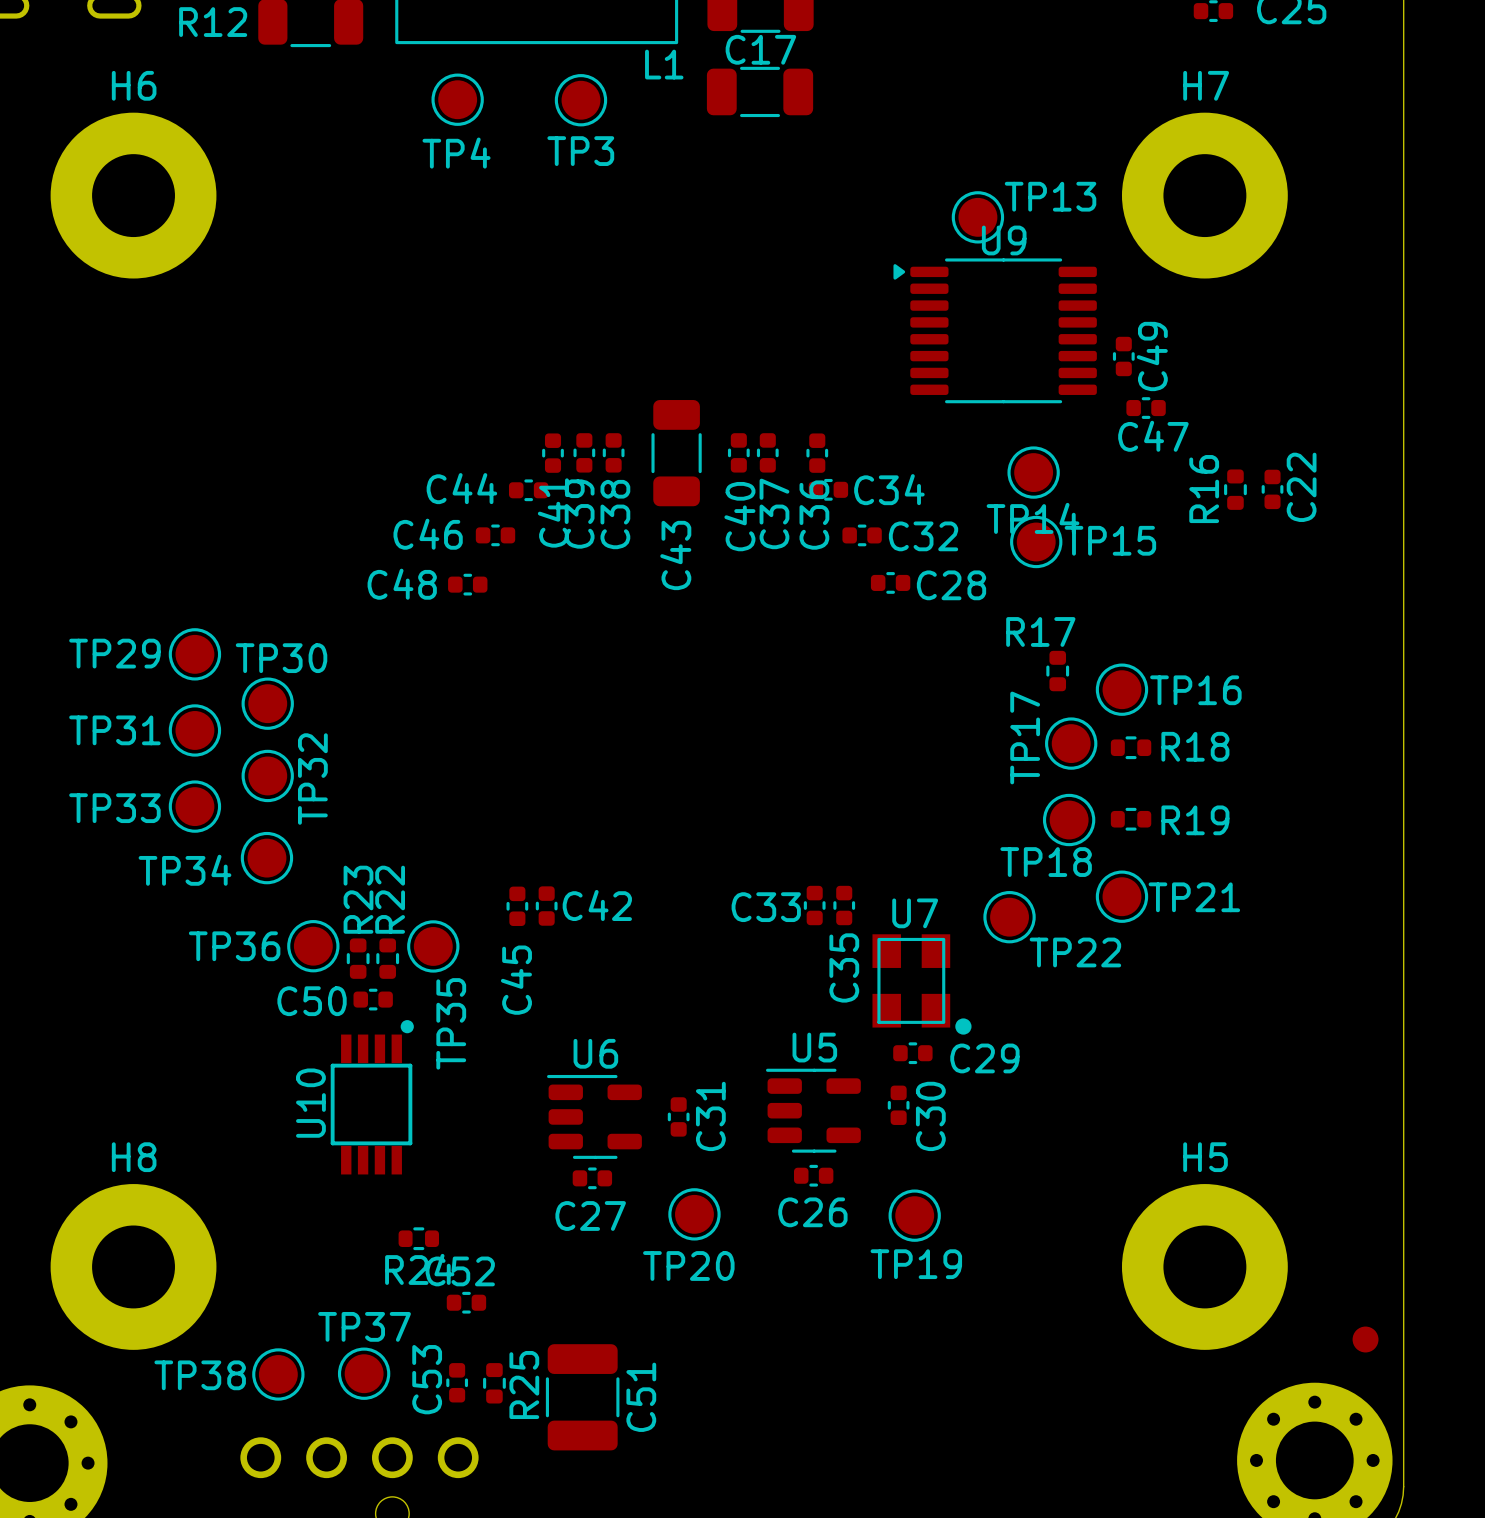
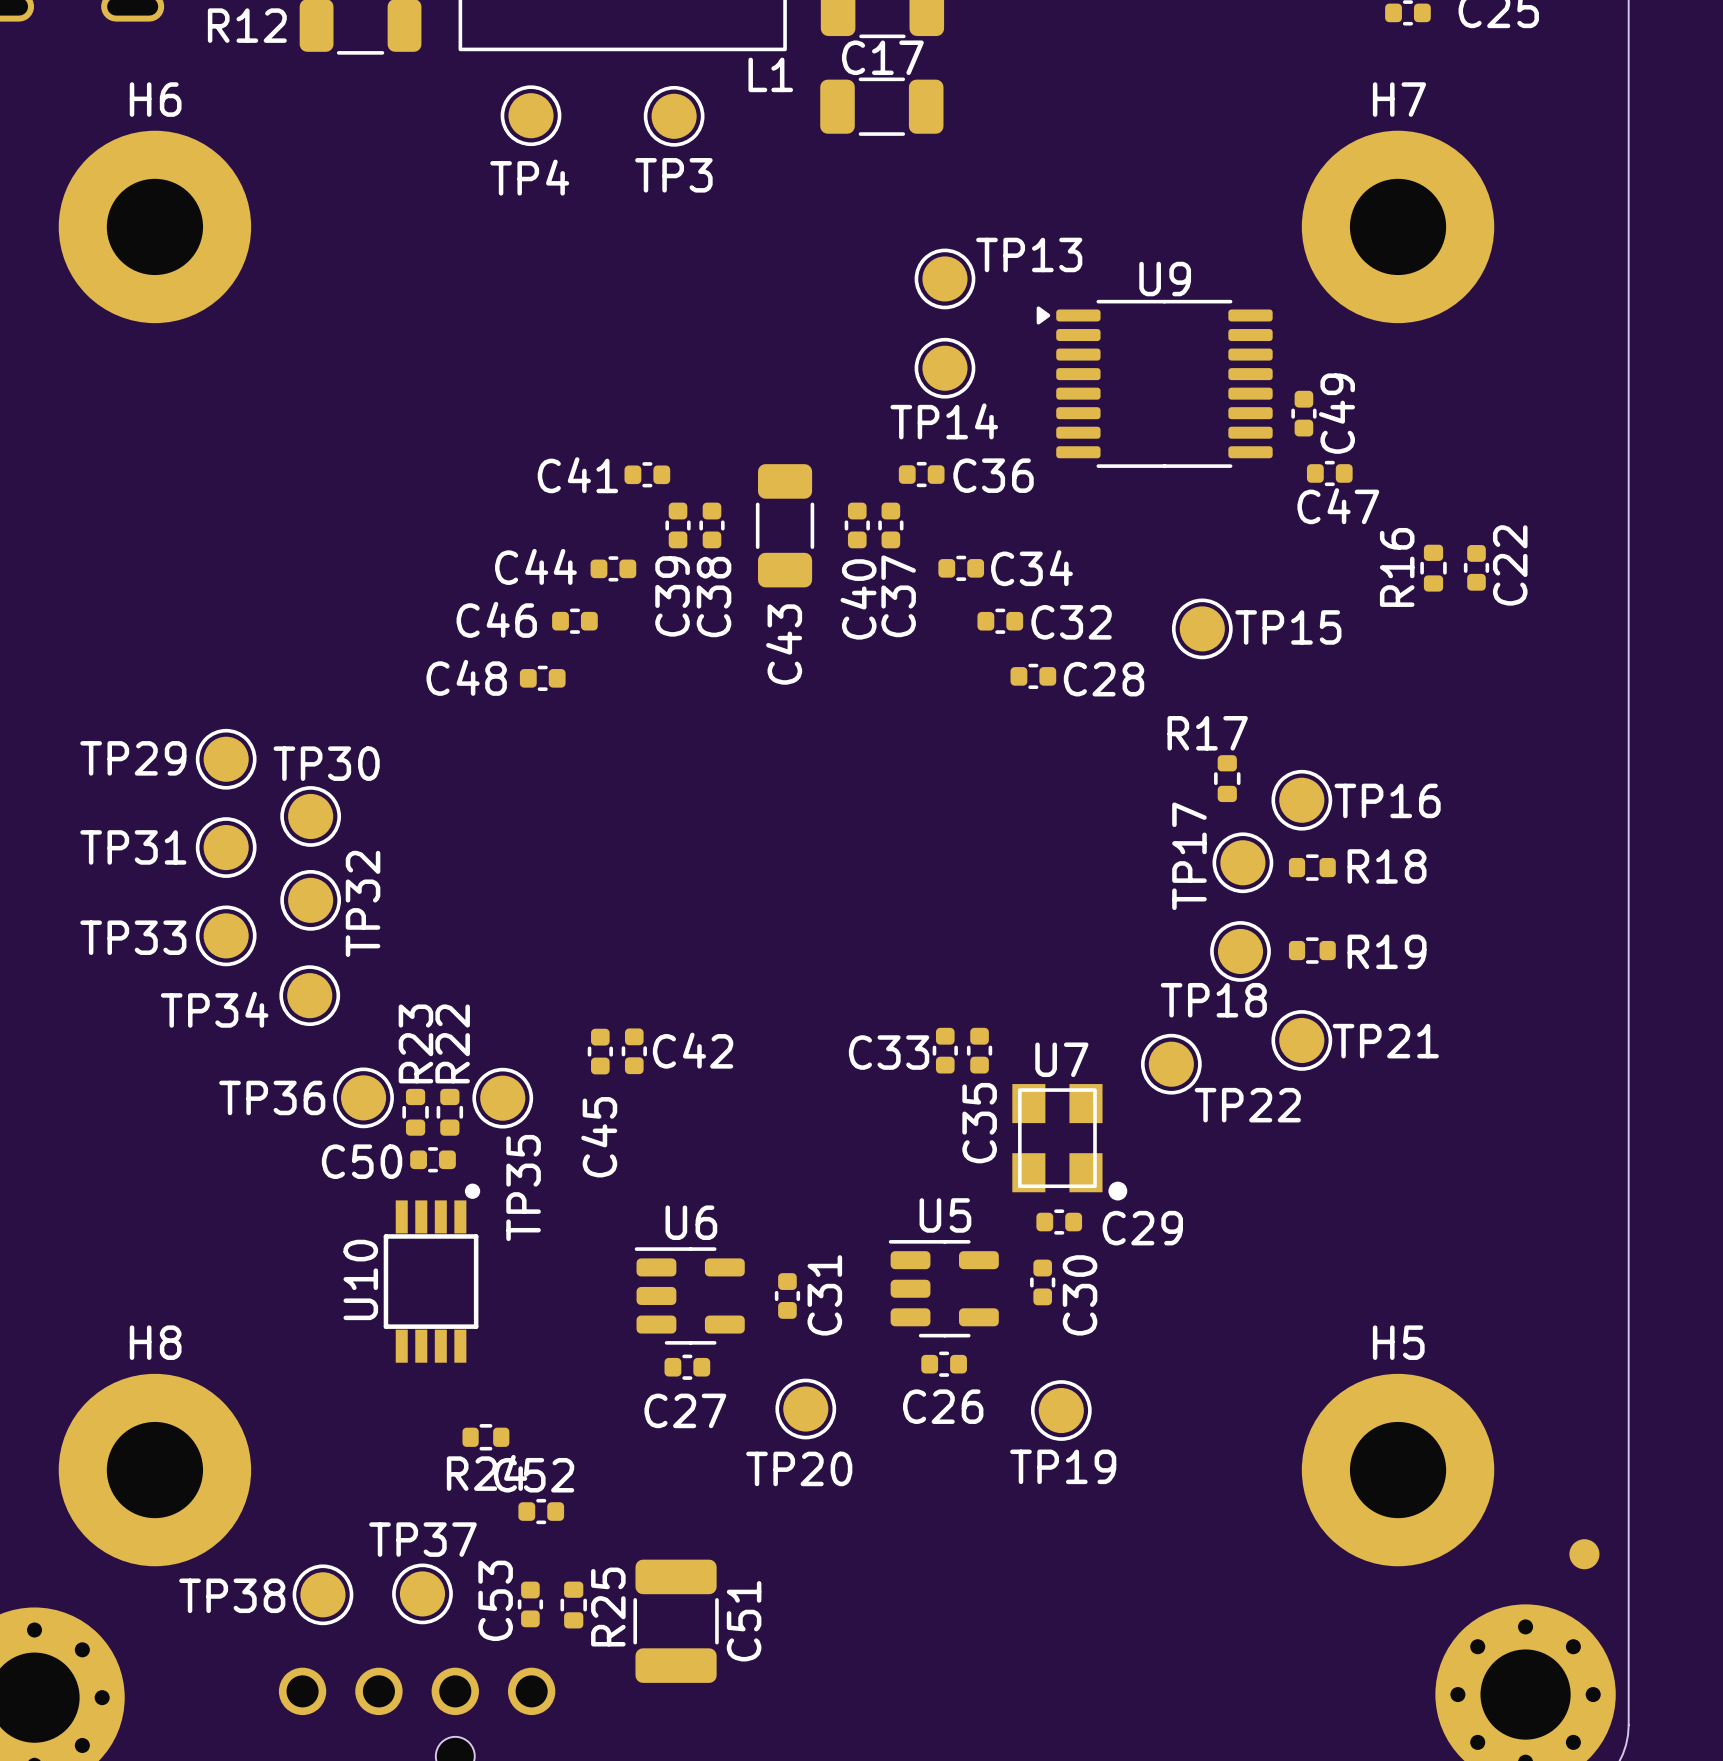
TP13 position: (977, 217) -> (944, 278)
C41 rotation: 0° (553, 453) -> 90° clockwise (647, 474)
C41 position: (553, 453) -> (647, 474)
C36 rotation: 0° (817, 453) -> 90° clockwise (921, 474)
C36 position: (817, 453) -> (921, 474)
TP14 position: (1033, 472) -> (944, 368)
C36 name position: C36 (814, 515) -> C36 (993, 475)

